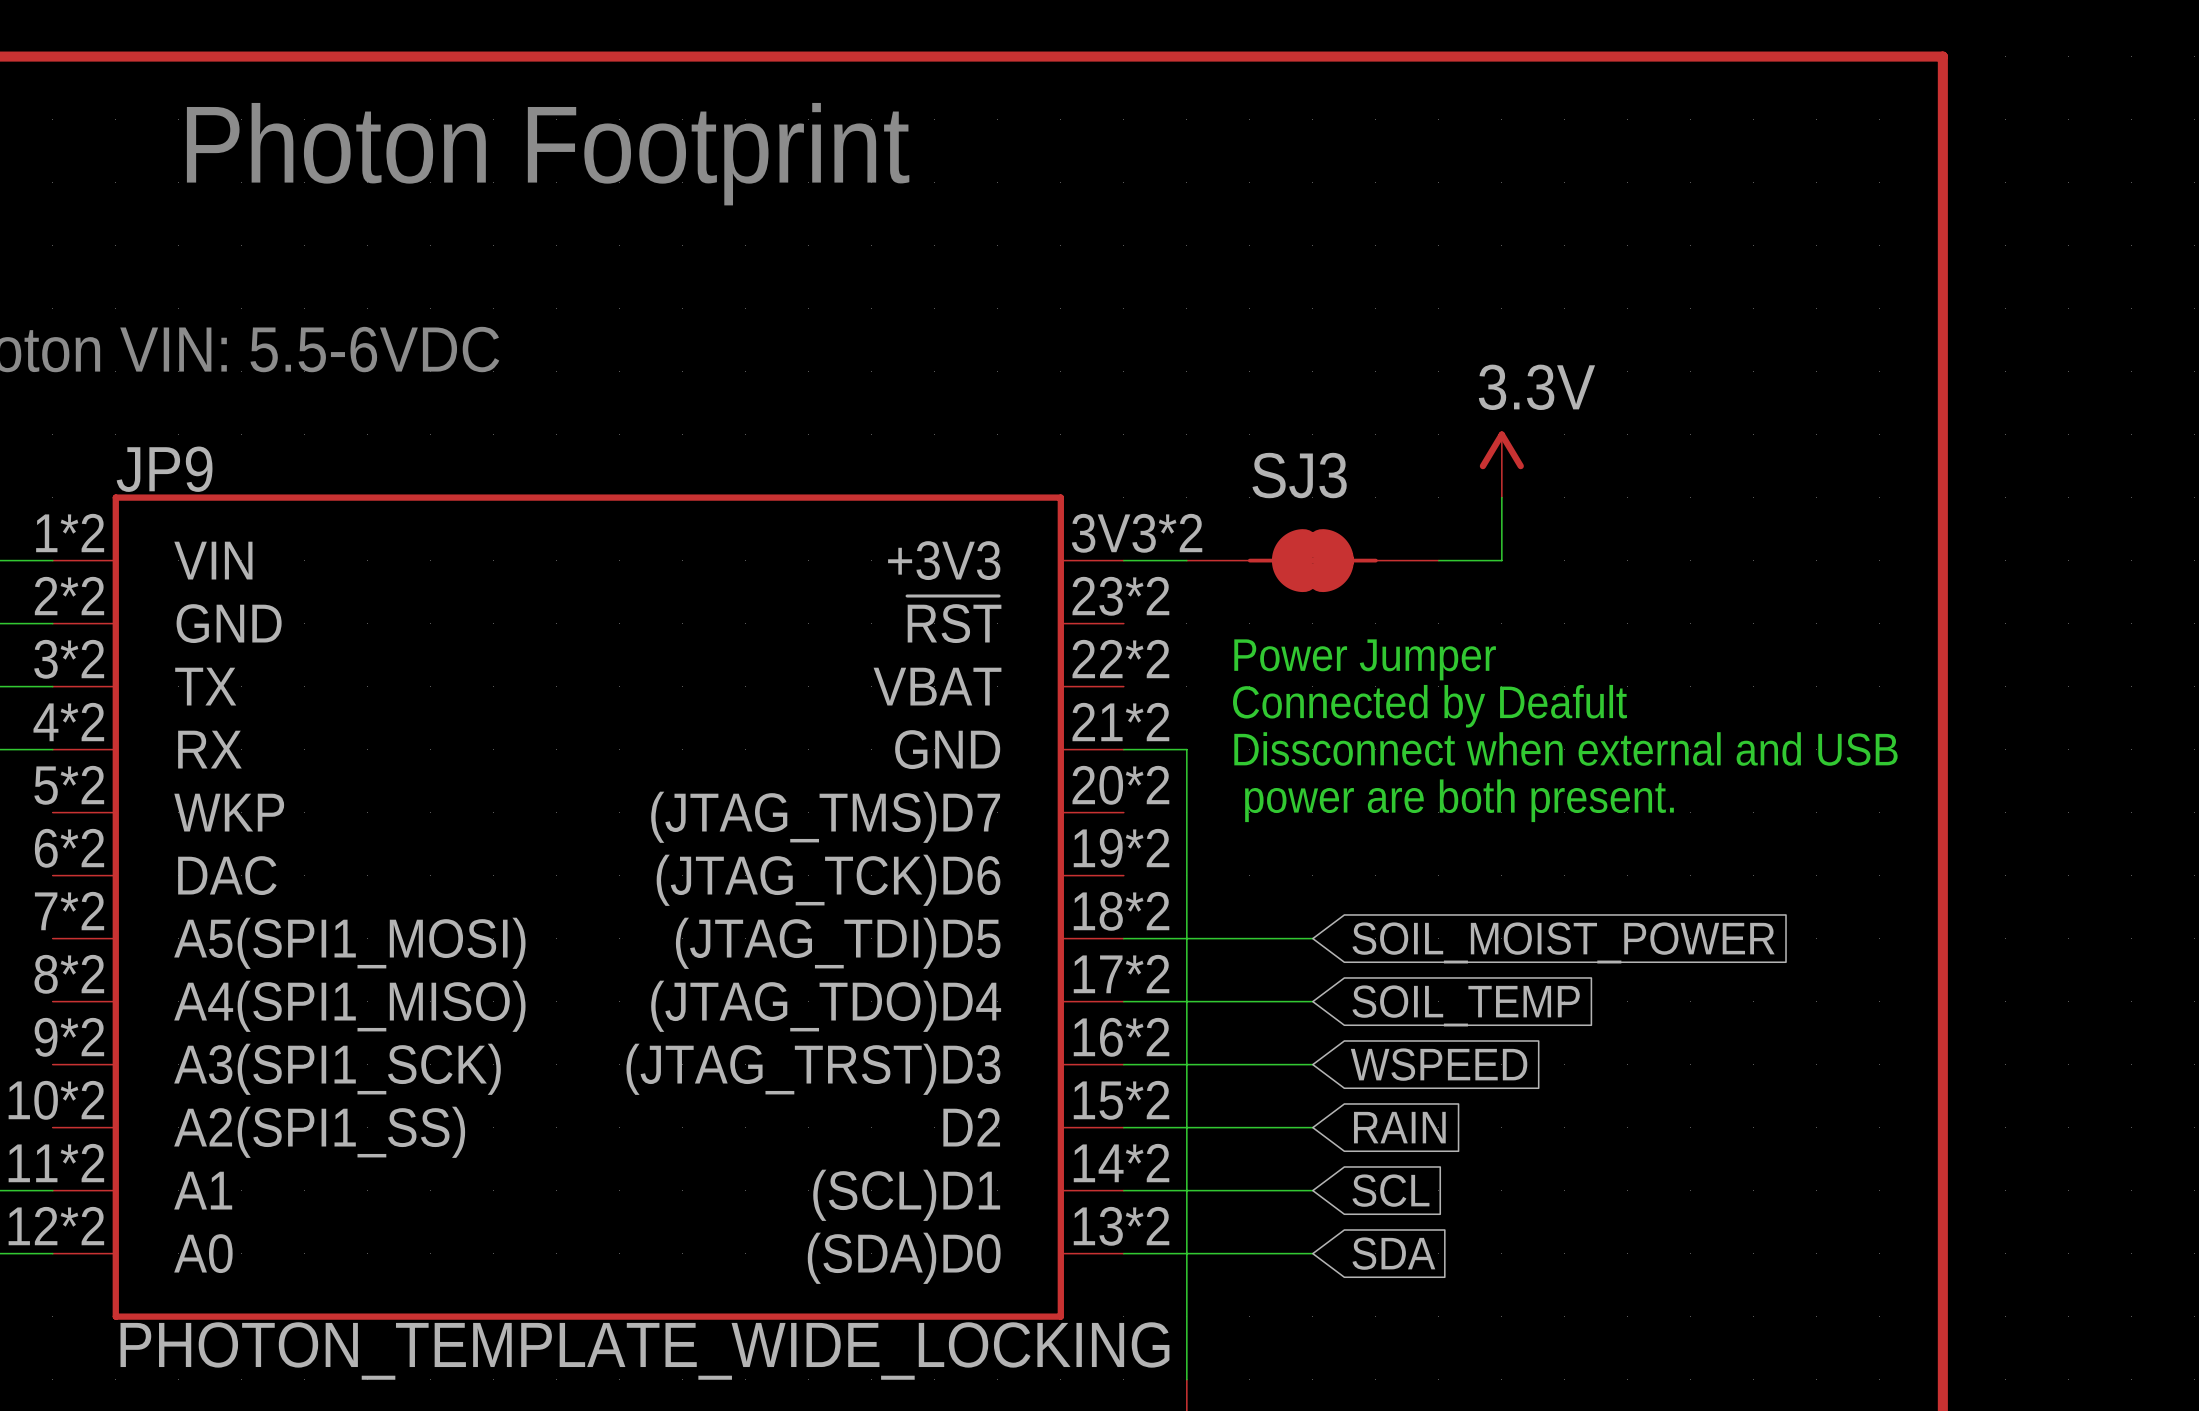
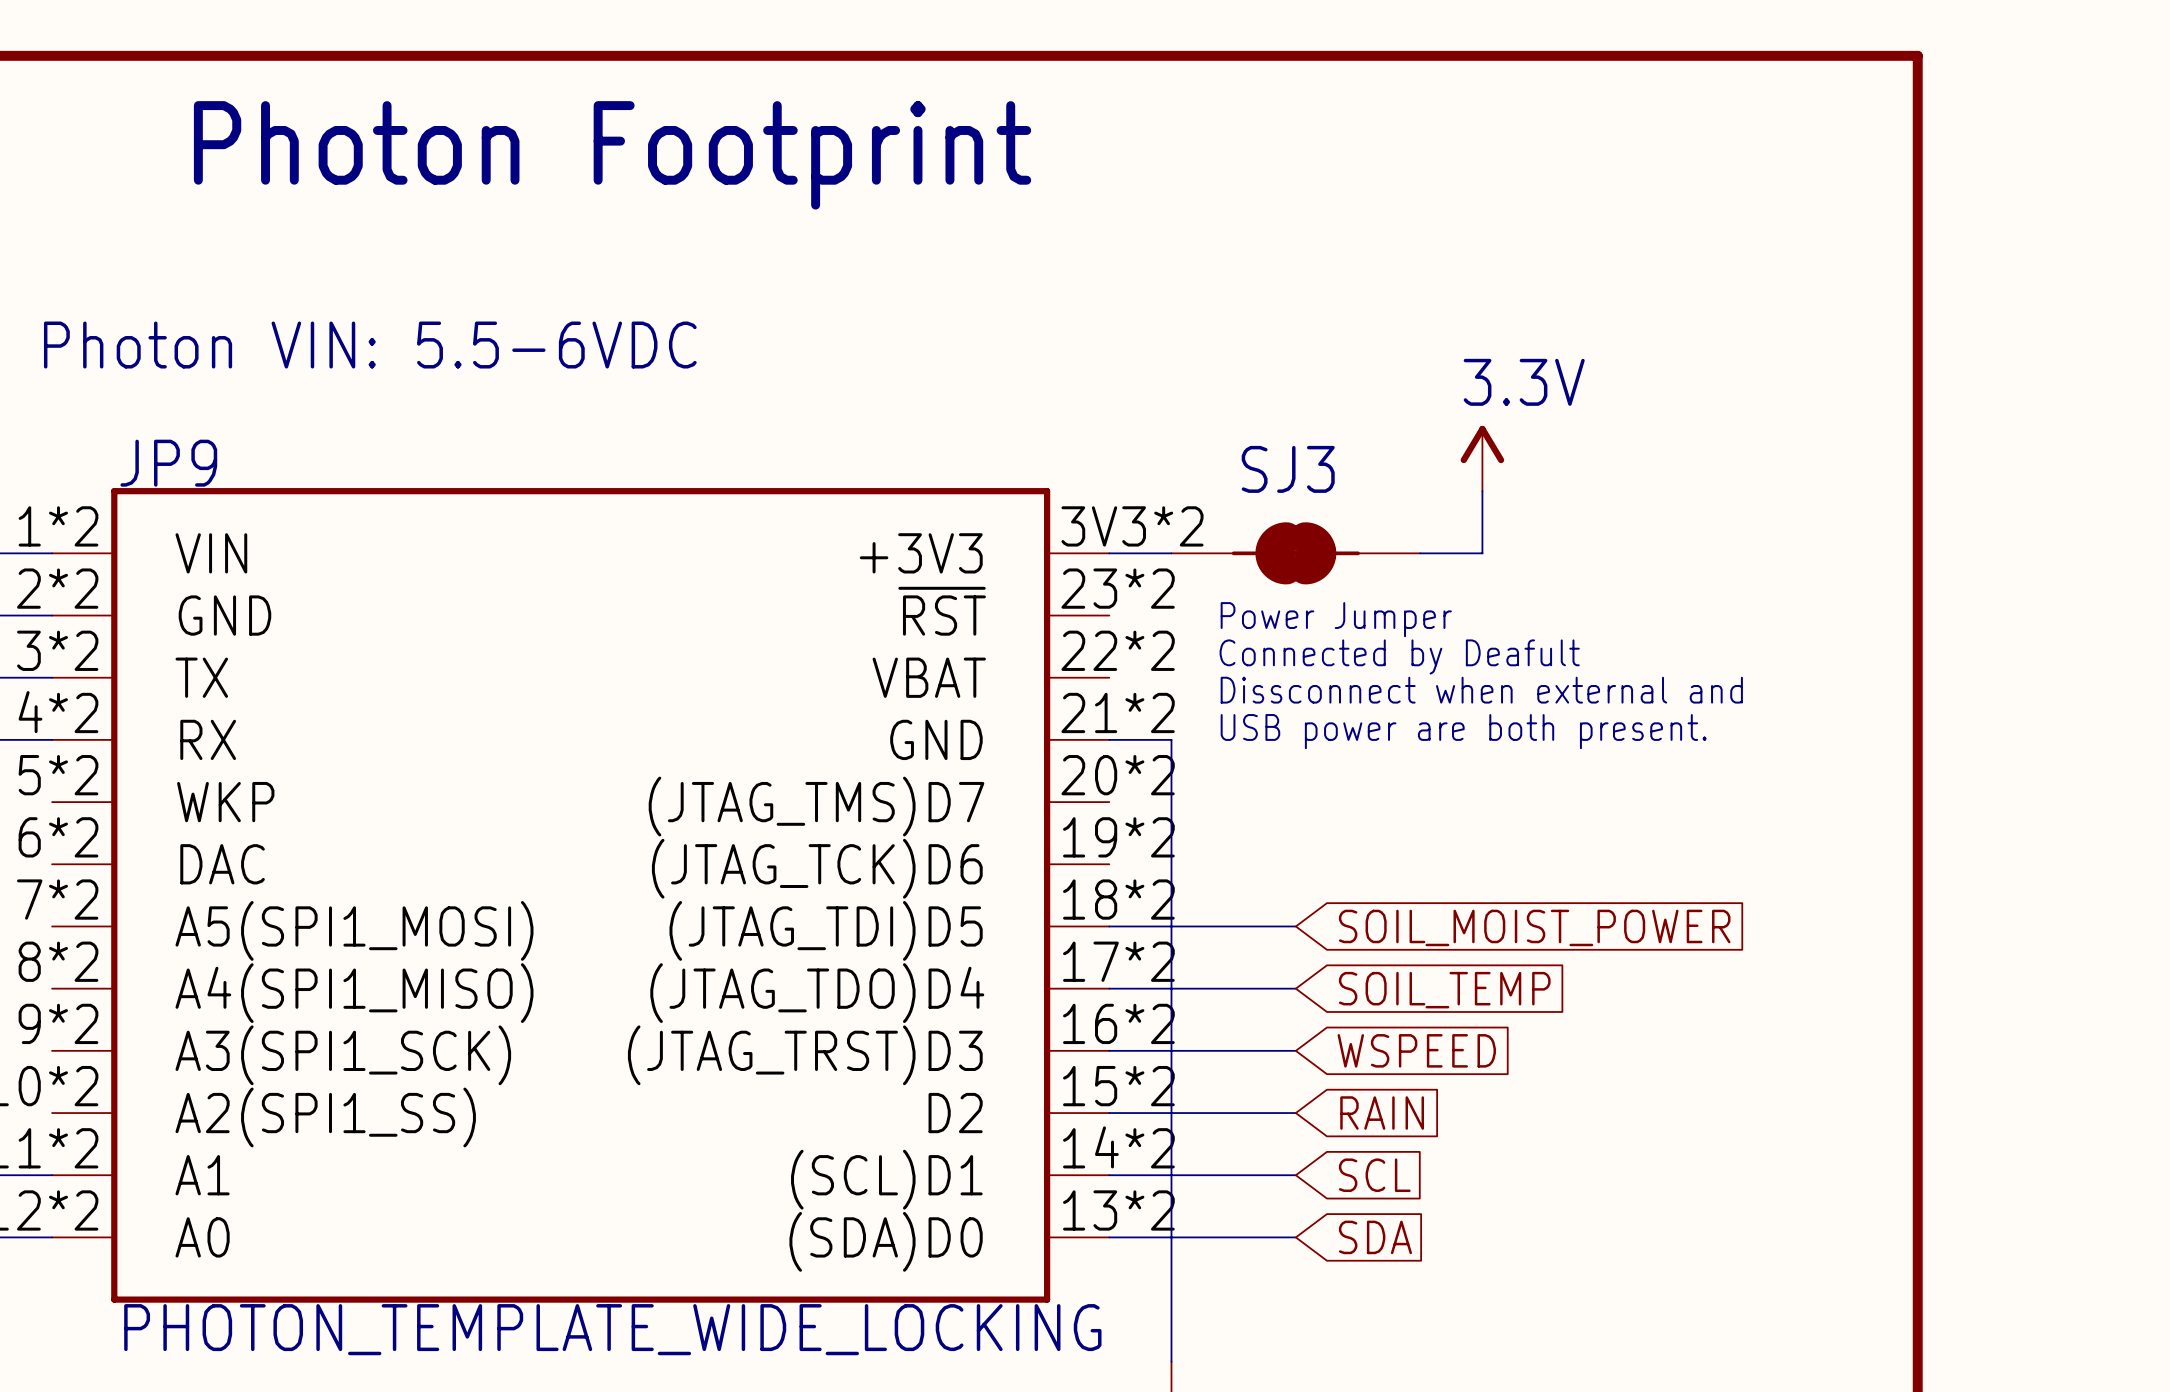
text: none -> Power Jumper (1336, 619)
text: Power Jumper (1365, 659) -> Connected by Deafult (1399, 656)
text: Connected by Deafult (1429, 706) -> Dissconnect when external and (1481, 690)
text: none -> USB power are both present. (1463, 731)
text: Dissconnect when external and USB (1565, 748) -> none
text: power are both present. (1459, 800) -> none

